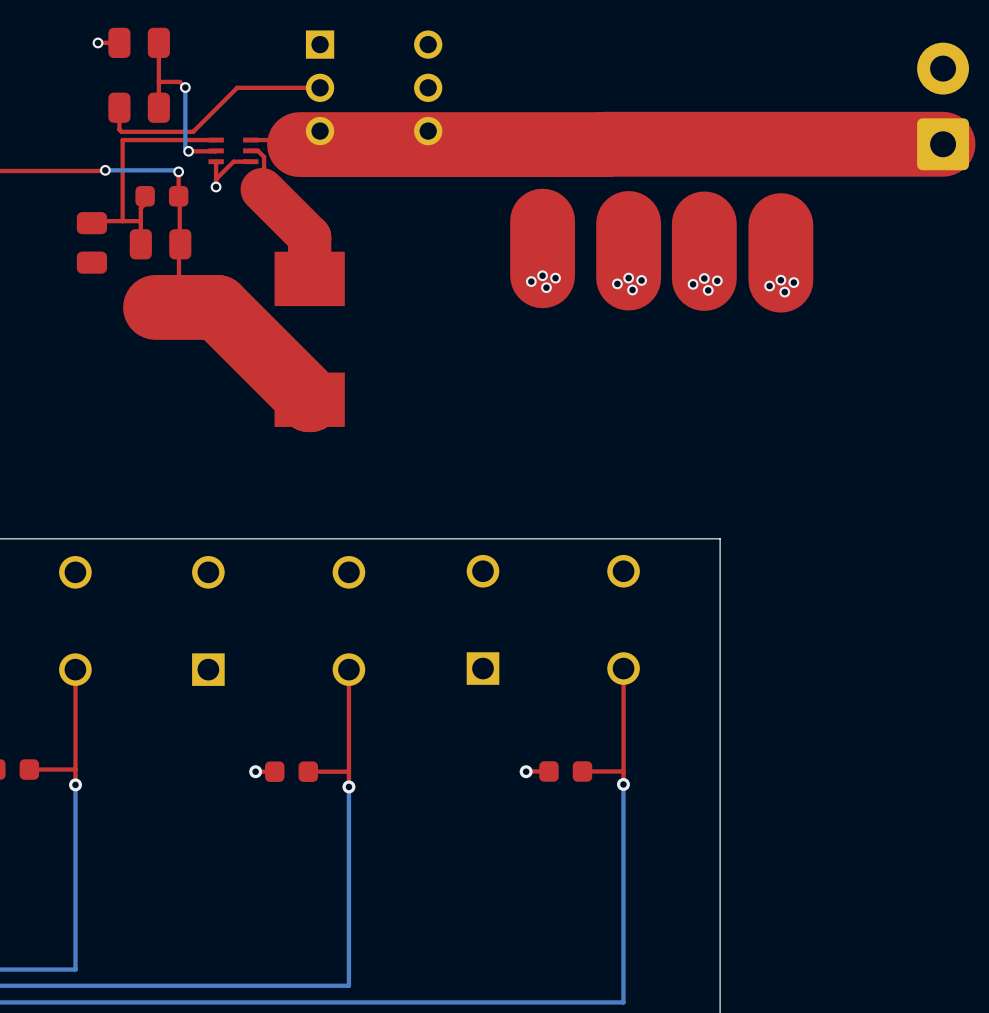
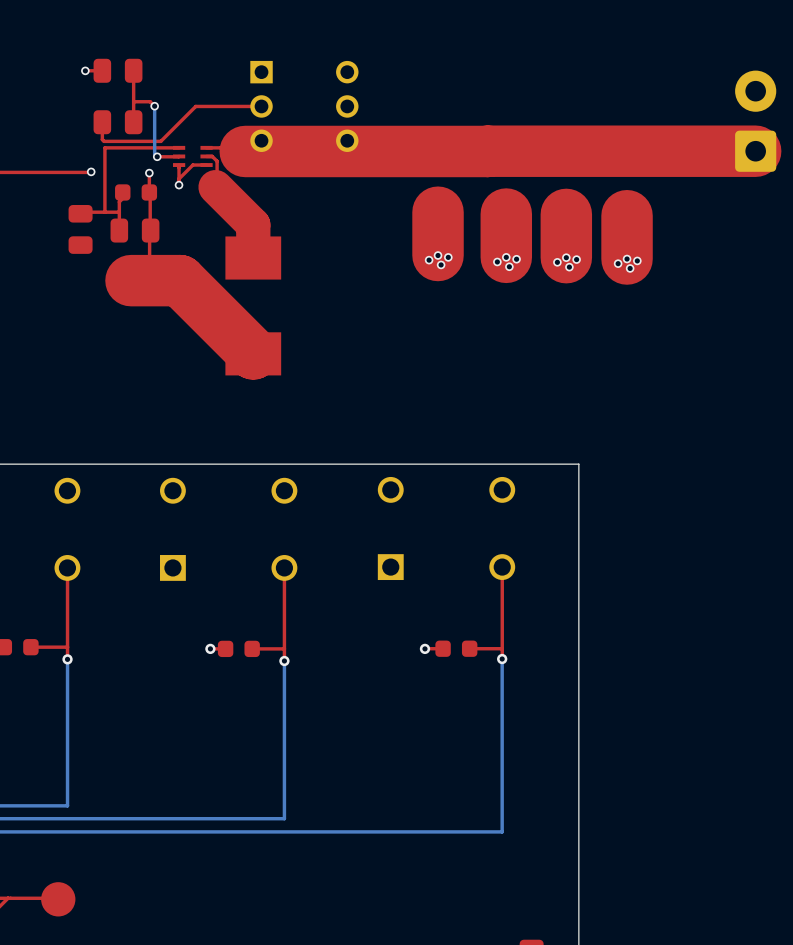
bottom track: (105, 170) (178, 171) -> none

